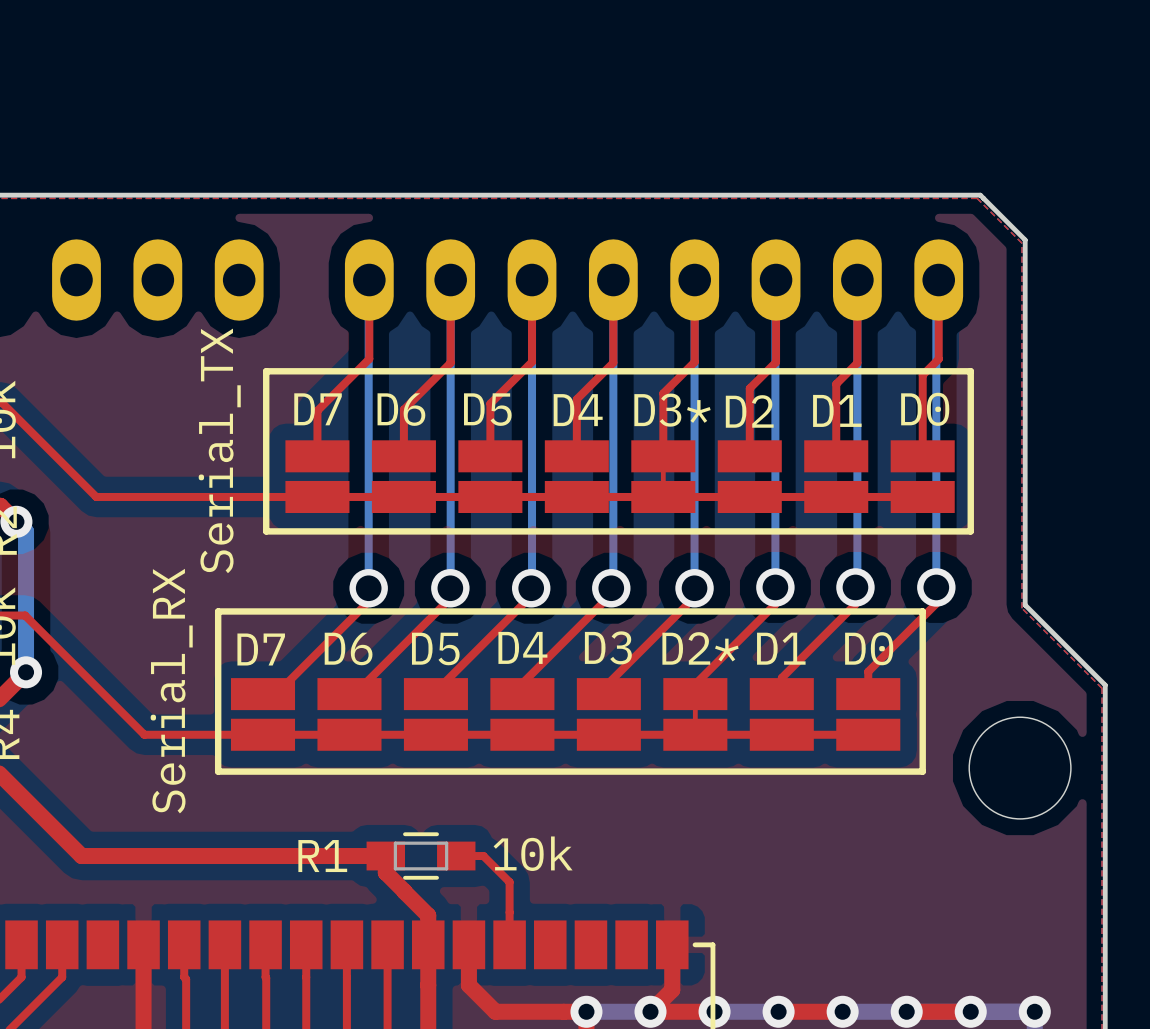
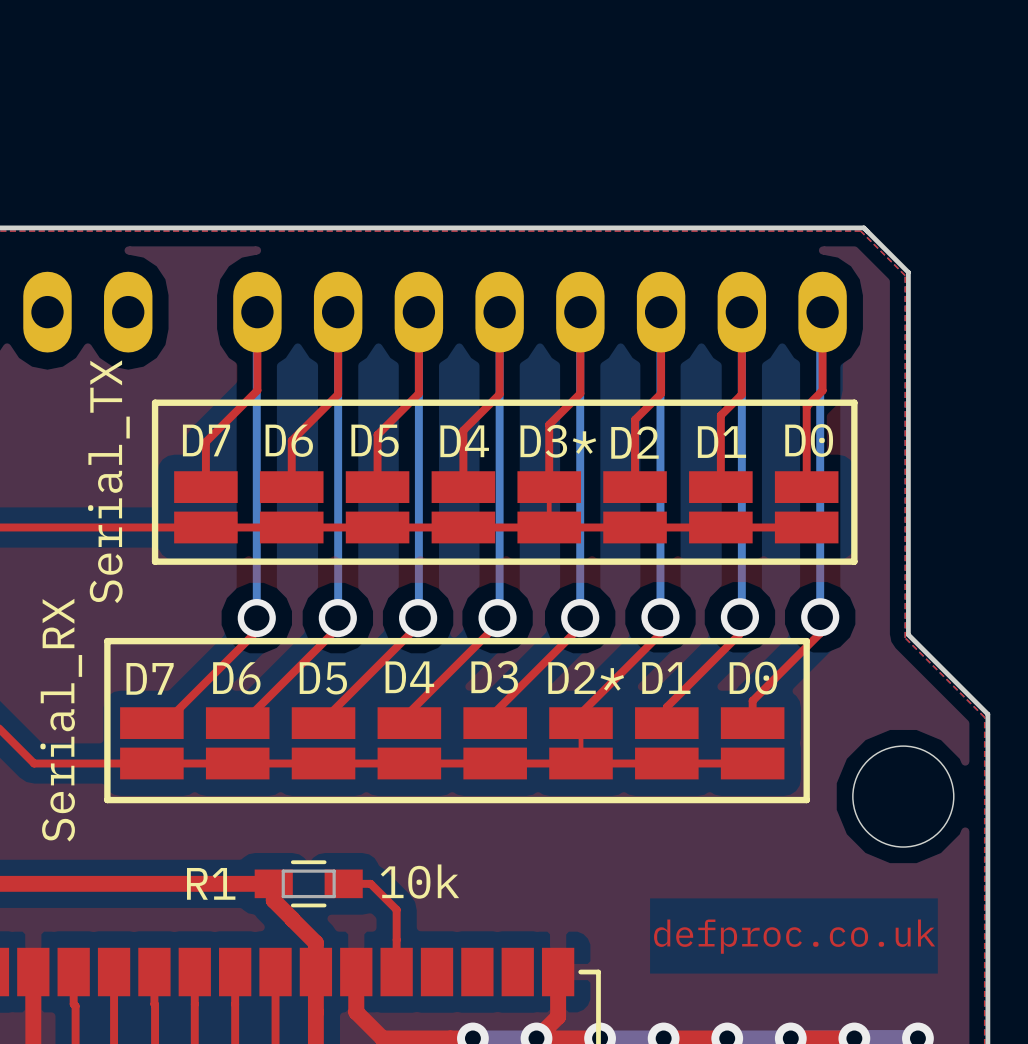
text: none -> defproc.co.uk (794, 936)

